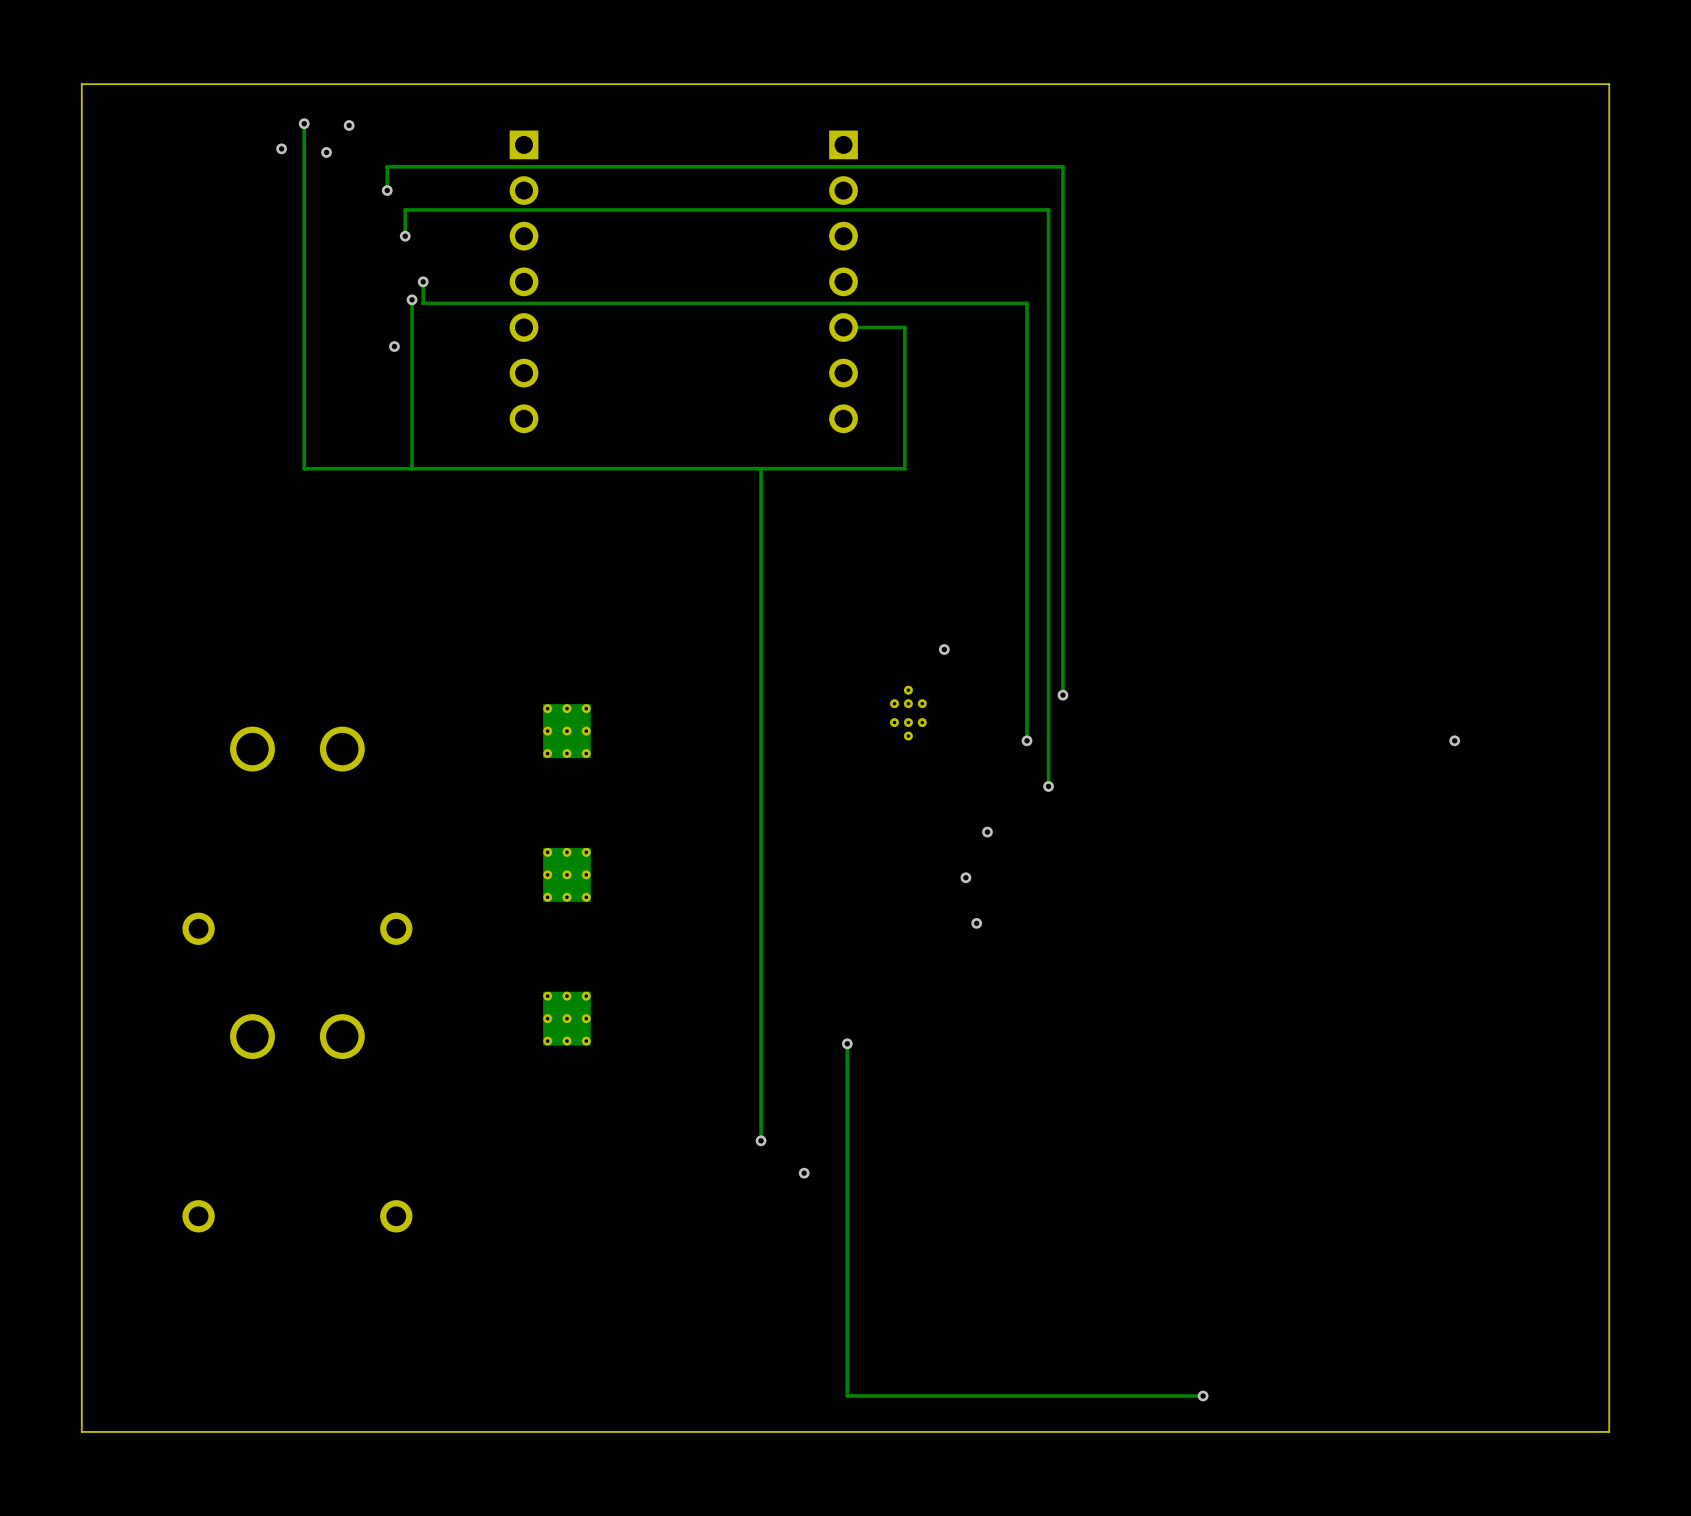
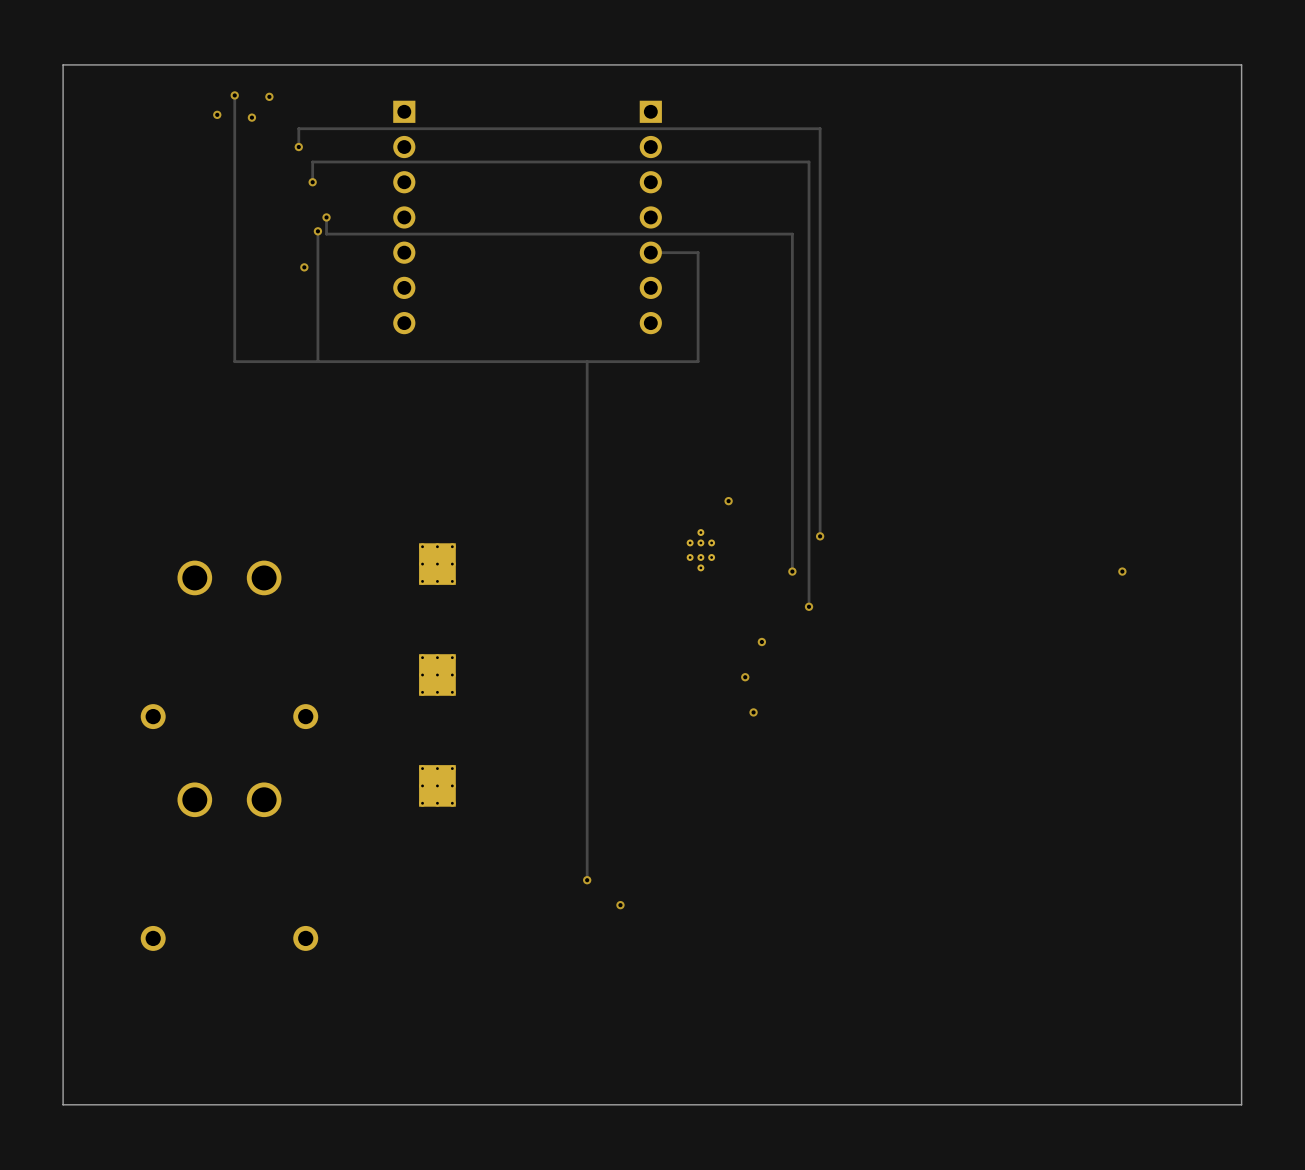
track: (847, 1043) (847, 1395) (1203, 1395) -> none
via: (847, 1043) -> none
via: (1203, 1395) -> none

